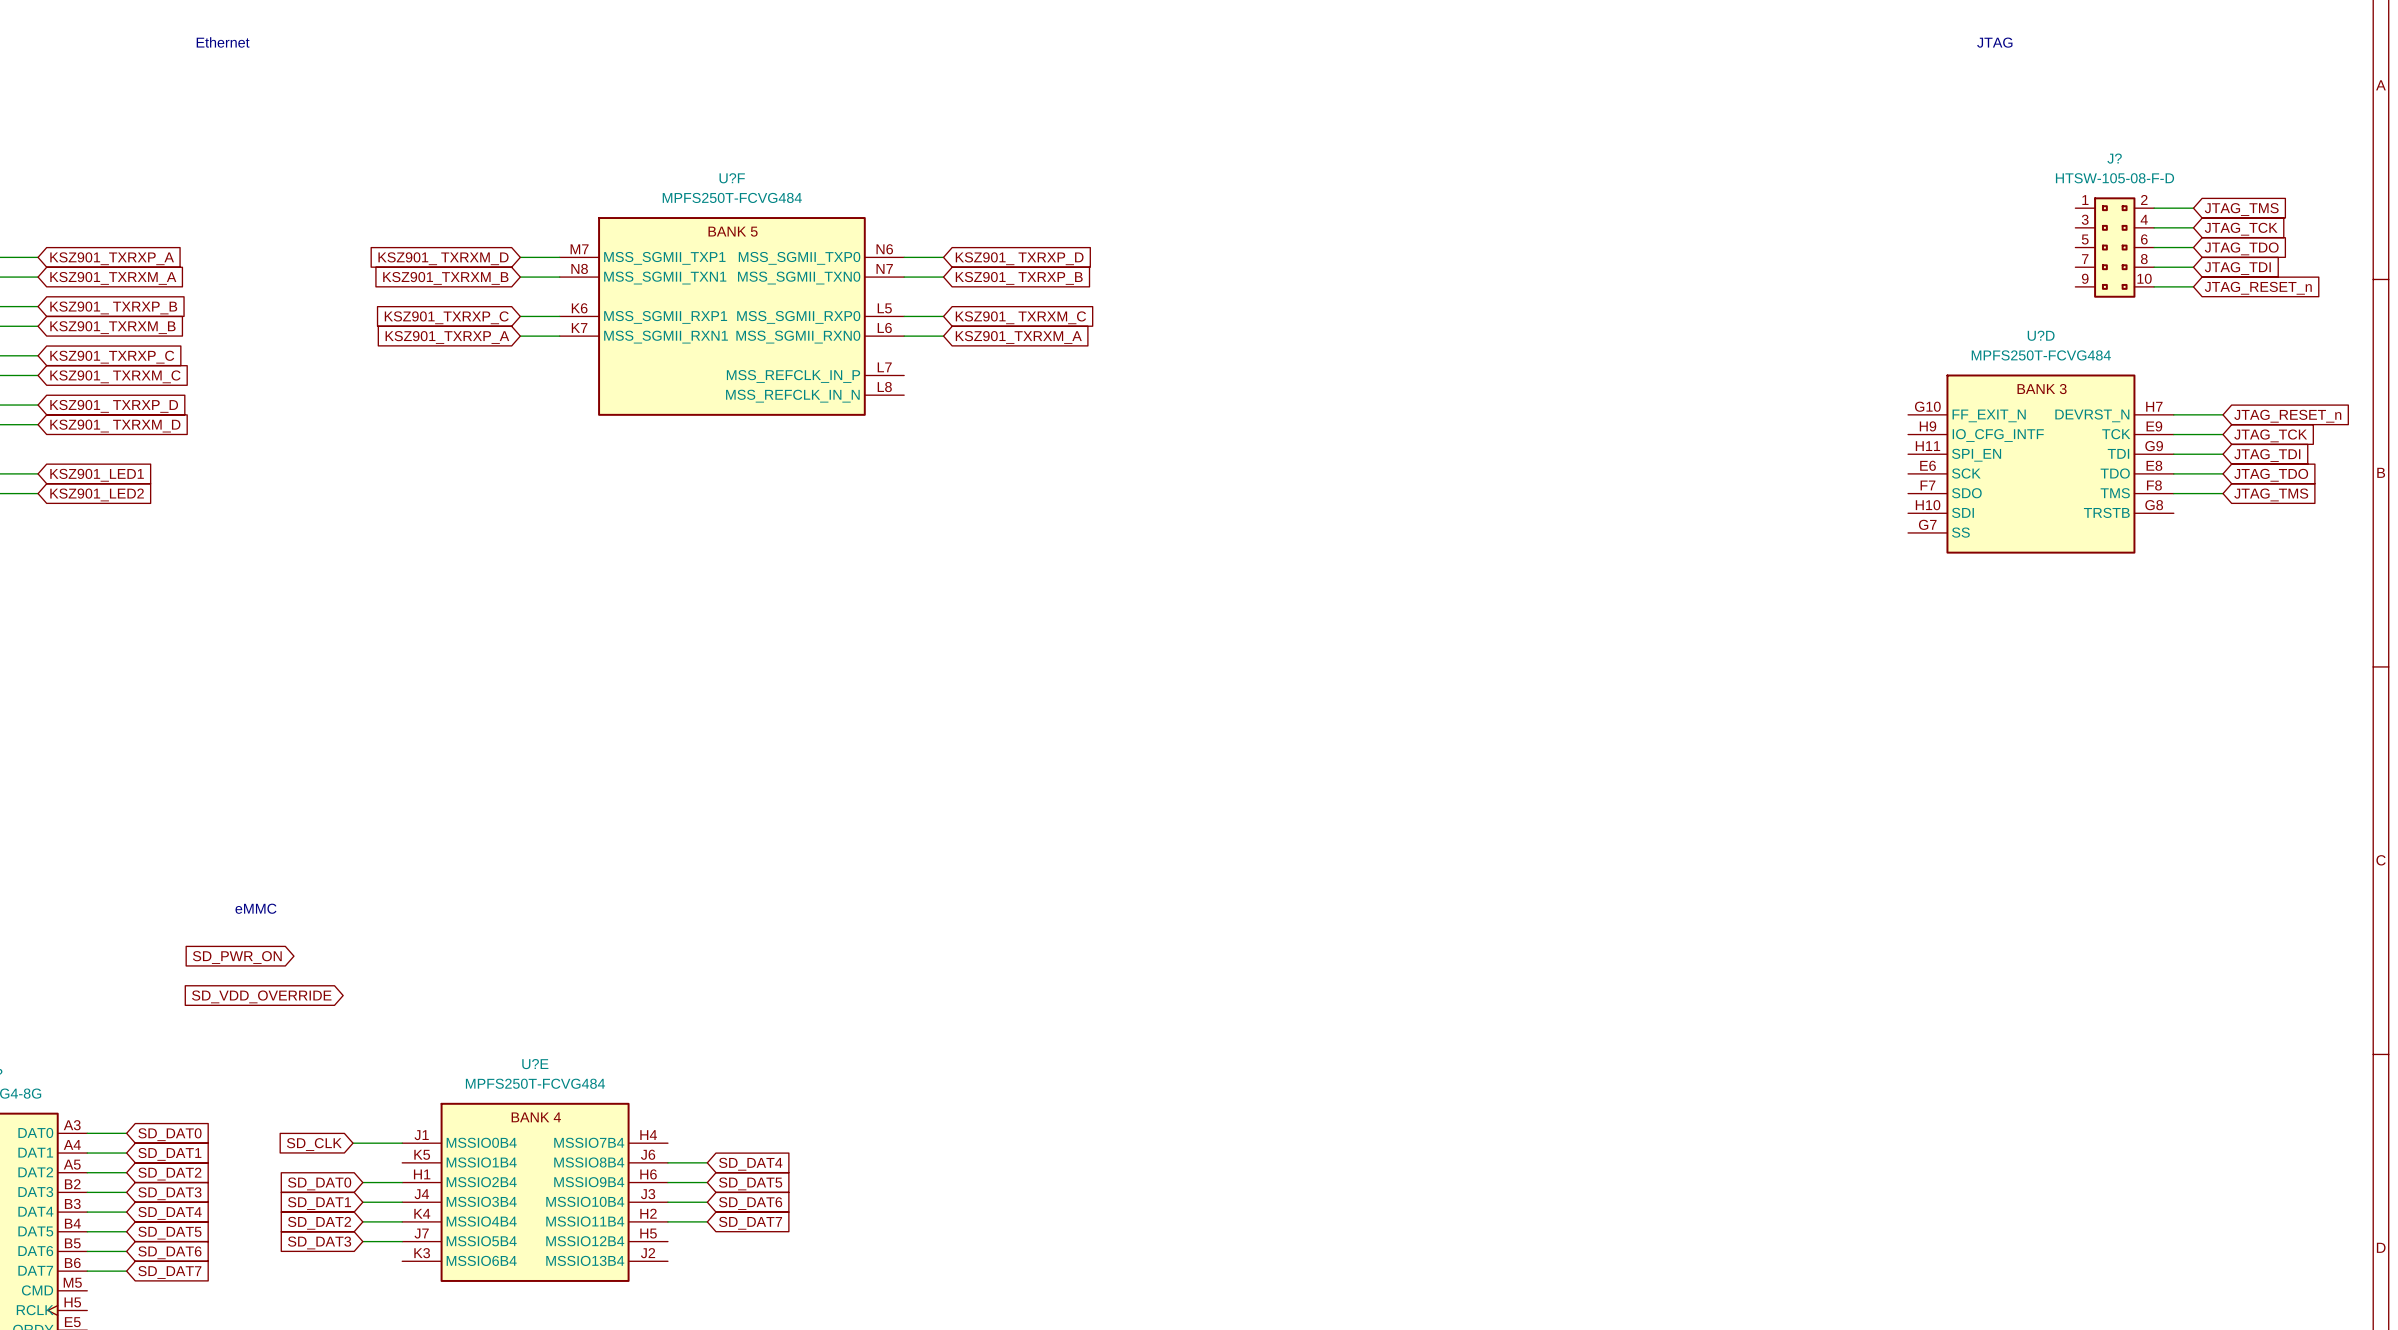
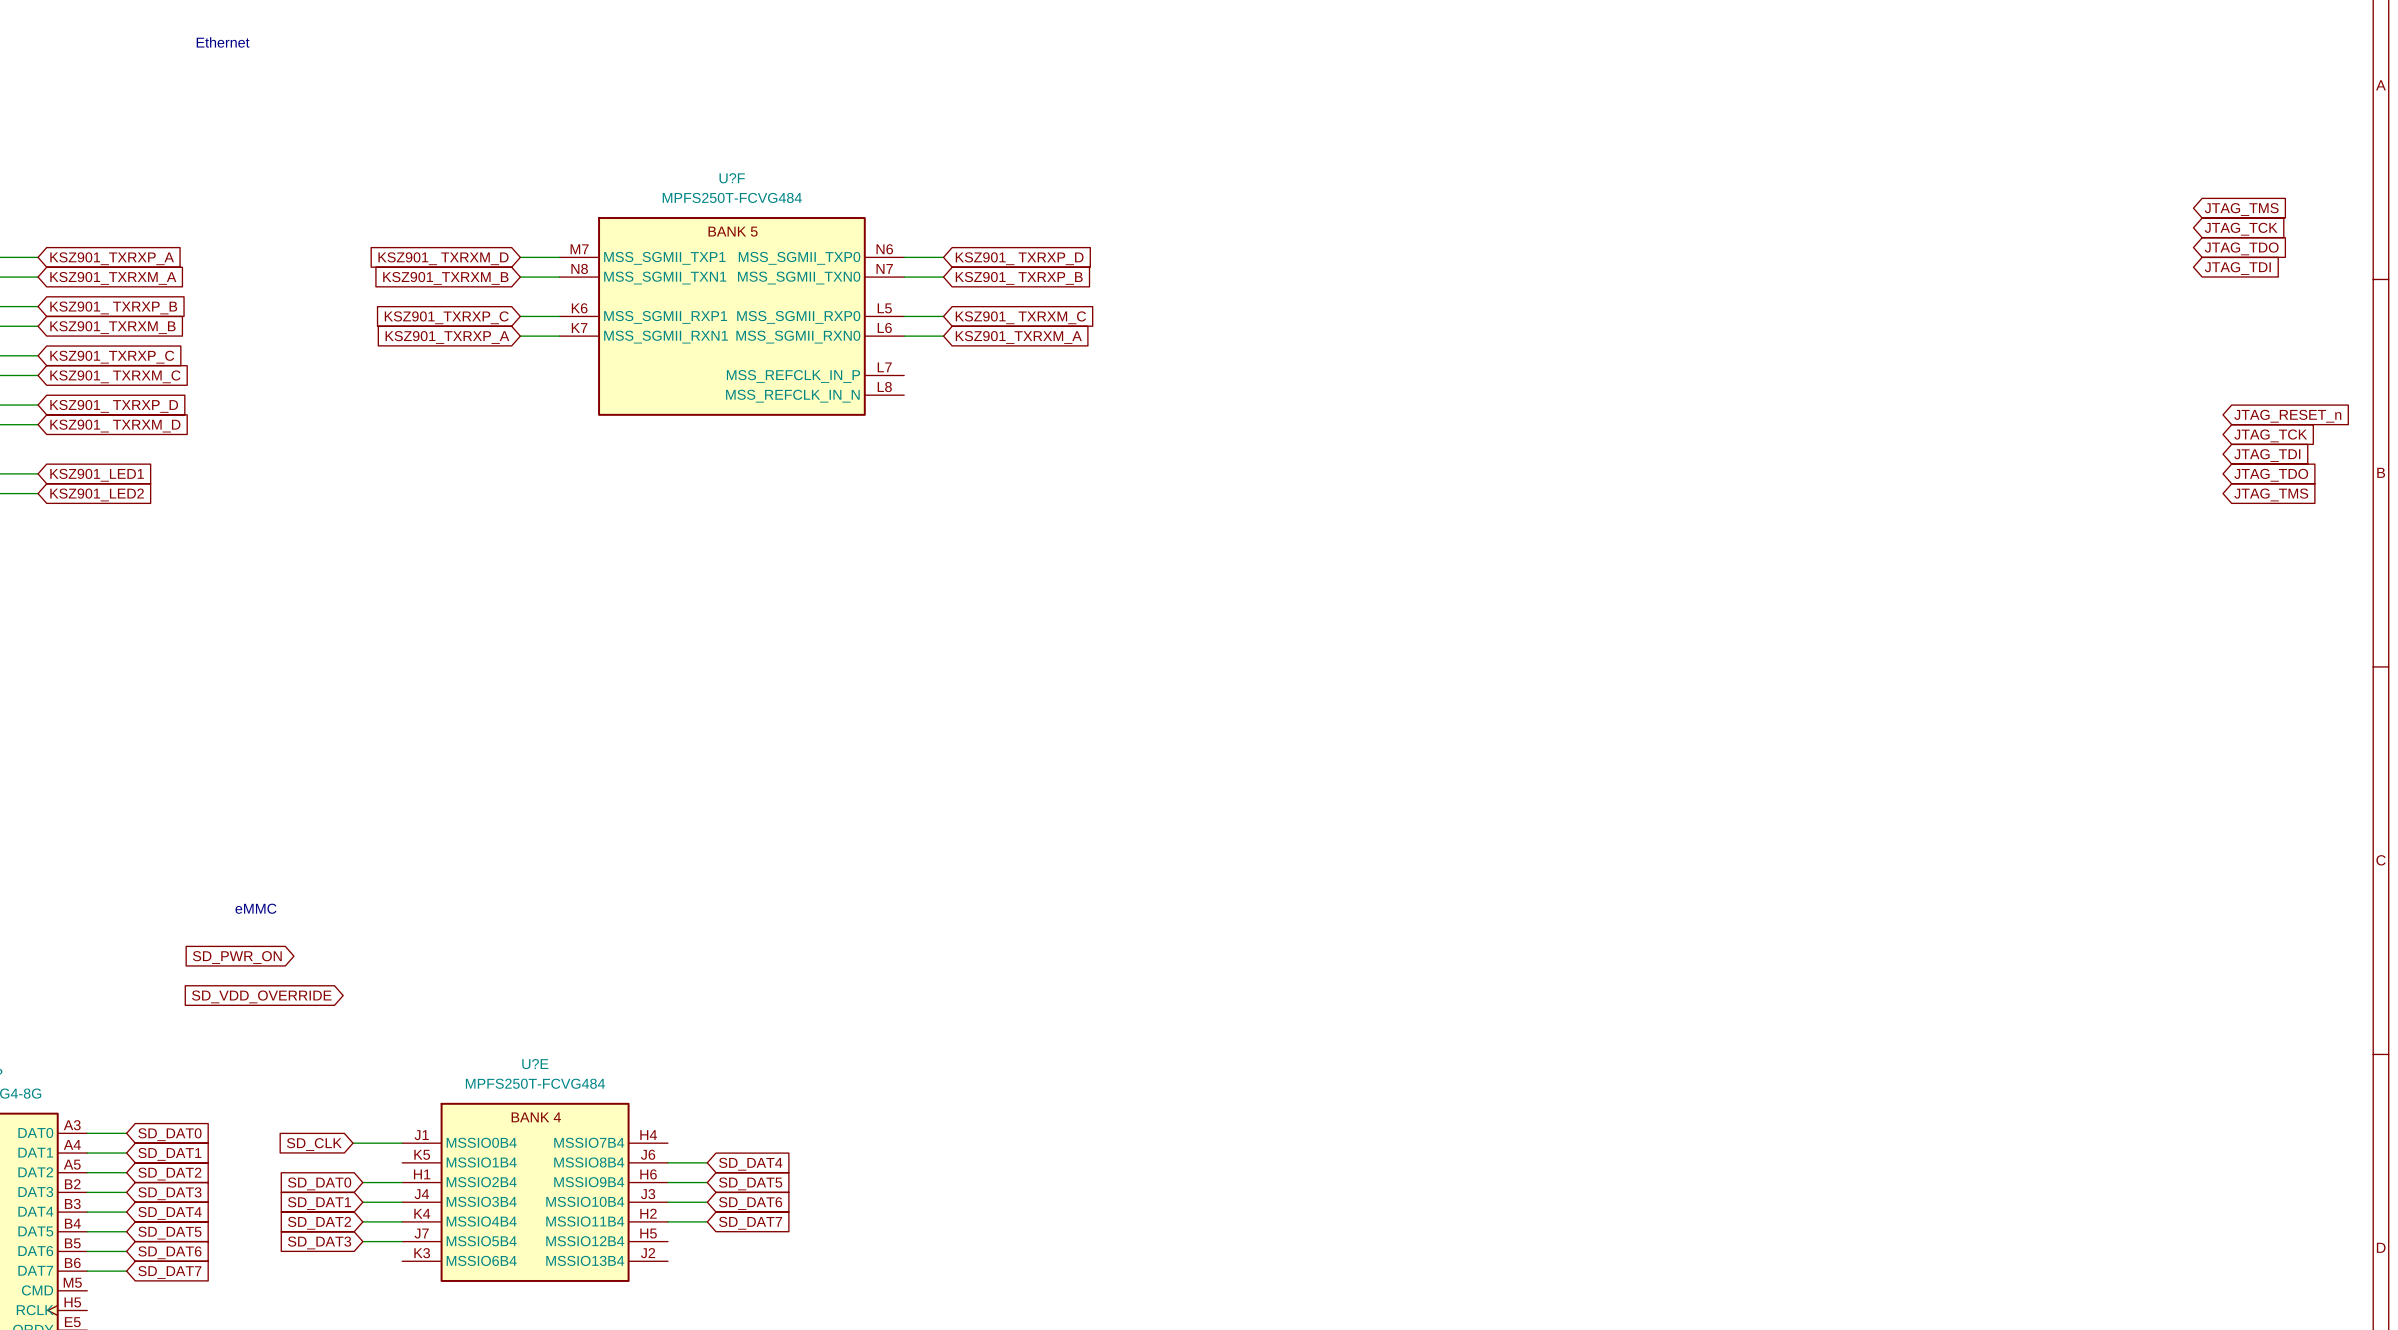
text: JTAG (1994, 42) -> none
wire: (2154, 208) (2193, 208) -> none
wire: (2154, 227) (2193, 227) -> none
J?: (2114, 247) -> none
wire: (2154, 247) (2193, 247) -> none
wire: (2154, 267) (2193, 267) -> none
wire: (2154, 286) (2193, 286) -> none
global label: JTAG_RESET_n (2258, 288) -> none
wire: (2173, 414) (2223, 414) -> none
wire: (2173, 434) (2223, 434) -> none
wire: (2173, 454) (2223, 454) -> none
U?D: (2040, 464) -> none
wire: (2173, 473) (2223, 473) -> none
wire: (2173, 493) (2223, 493) -> none

